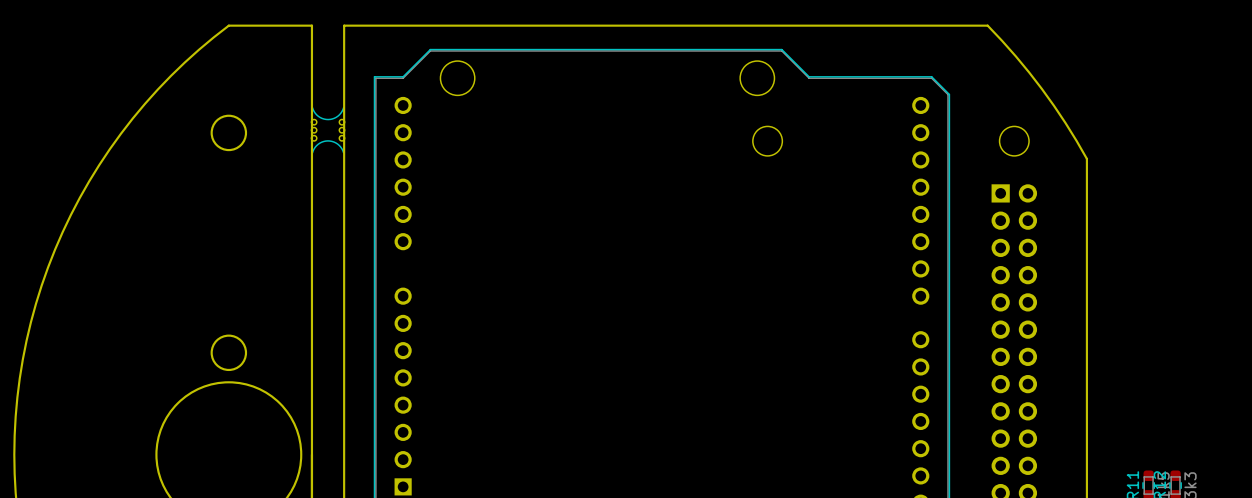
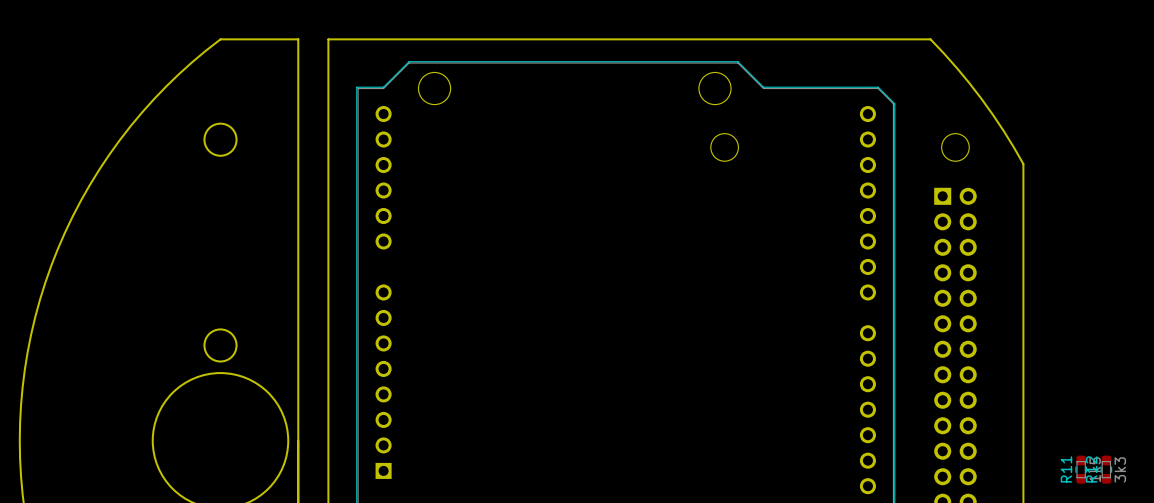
part: (328, 130) -> none

